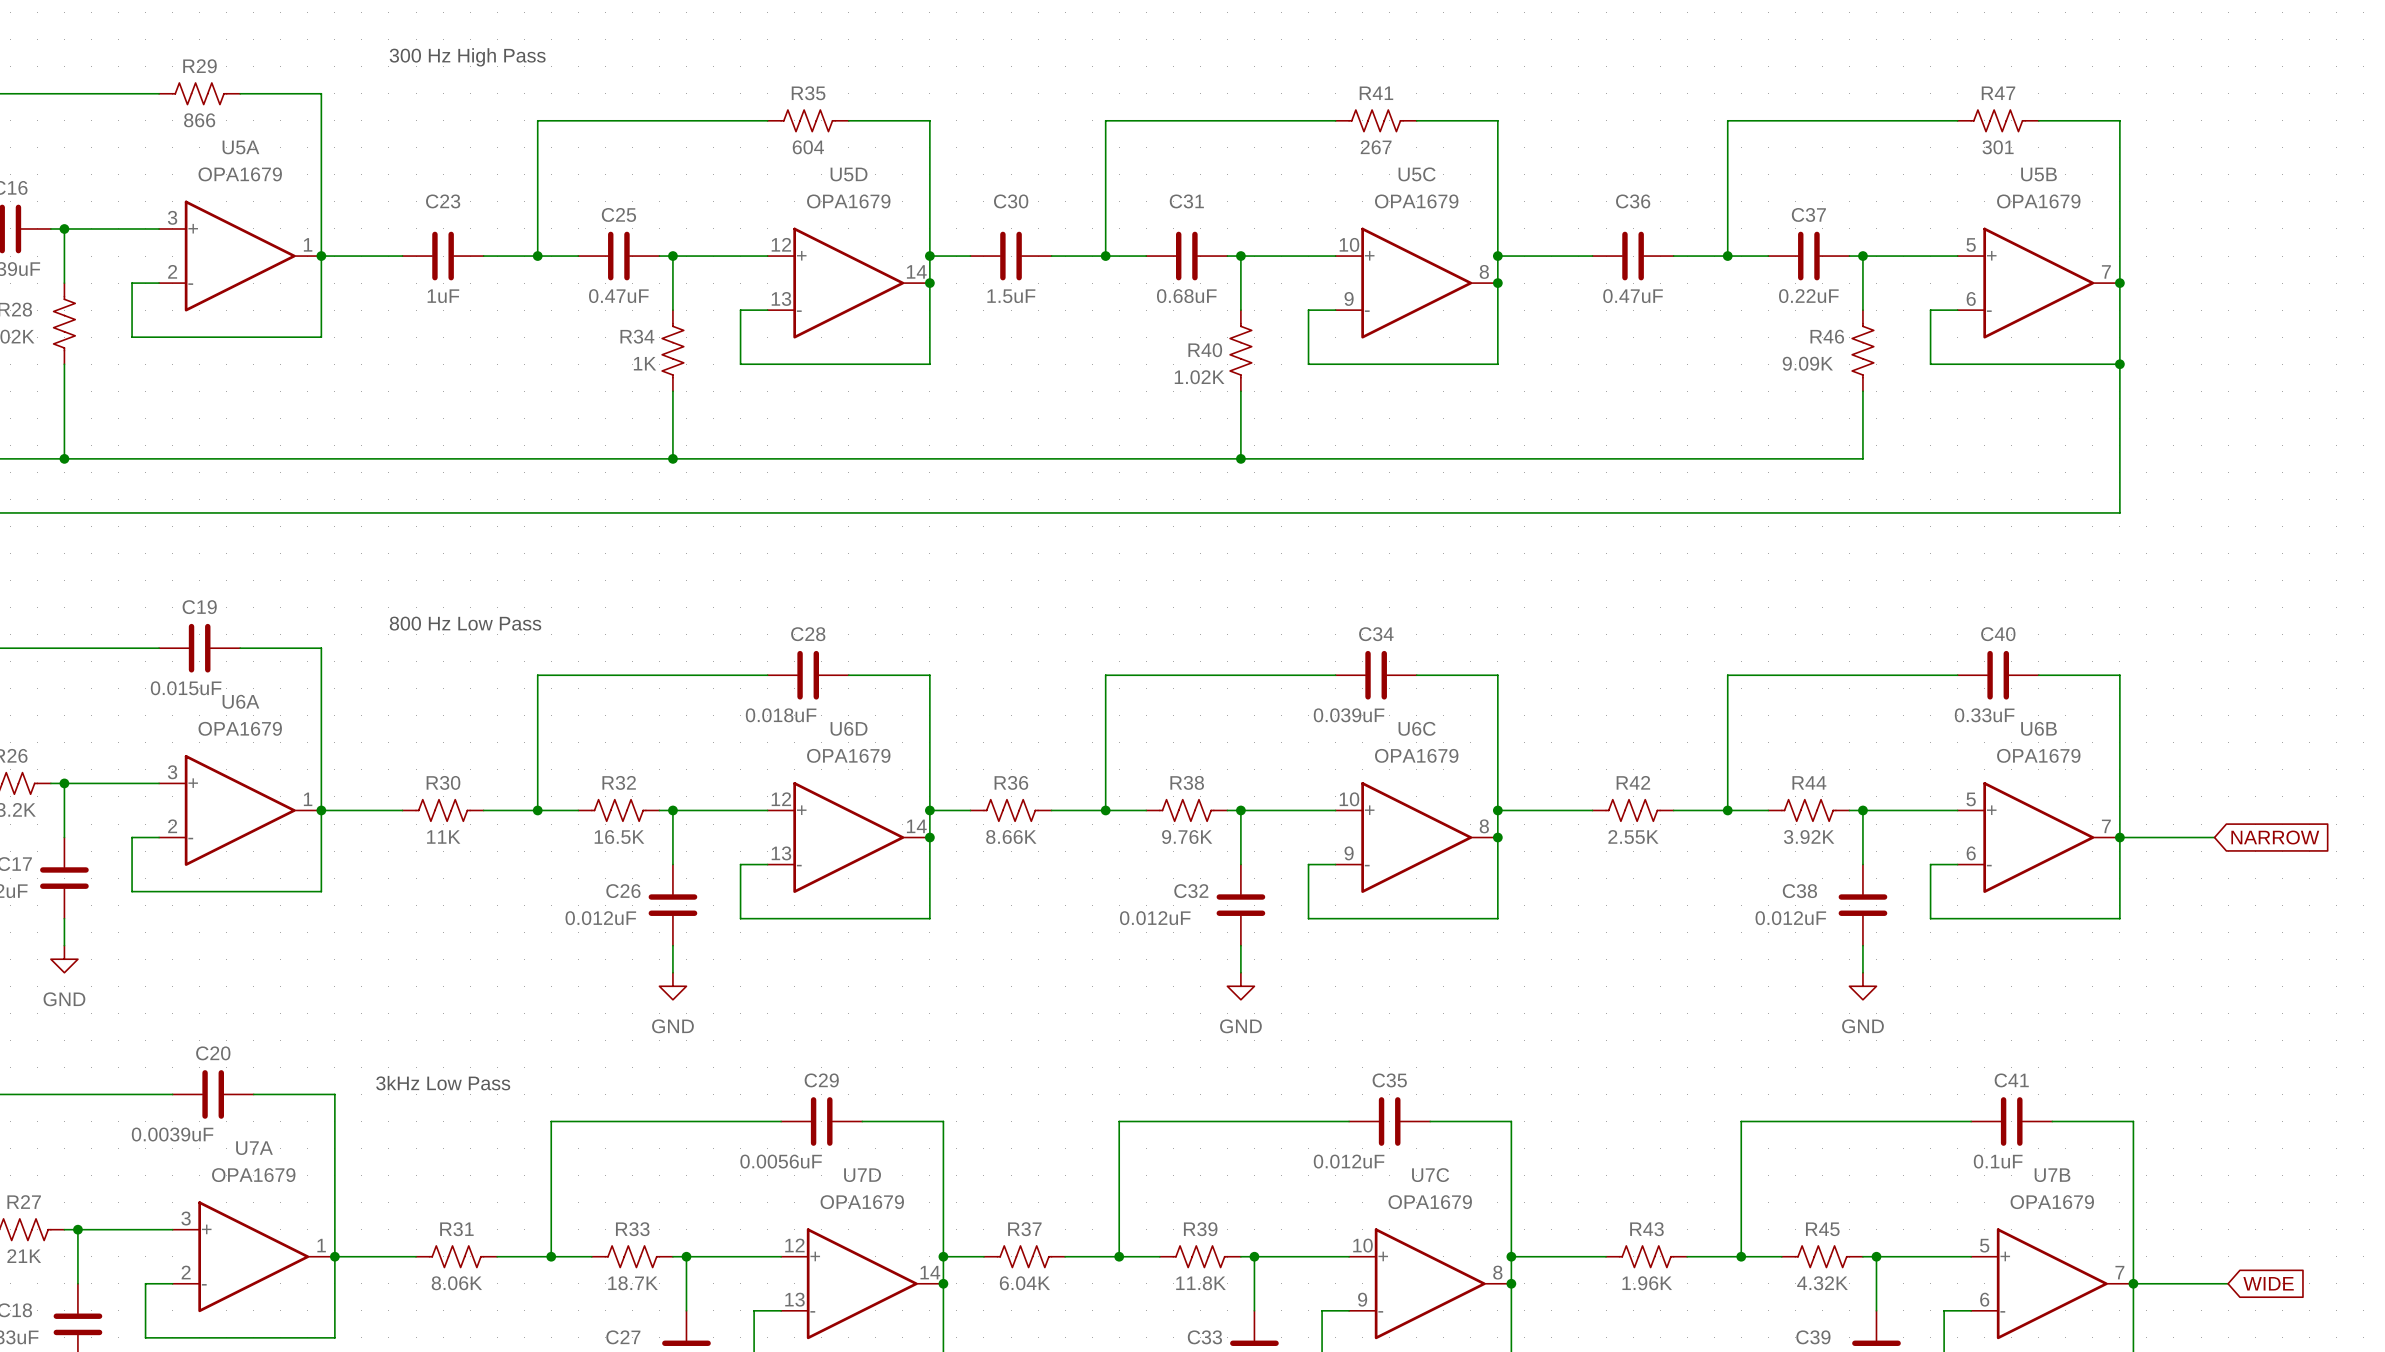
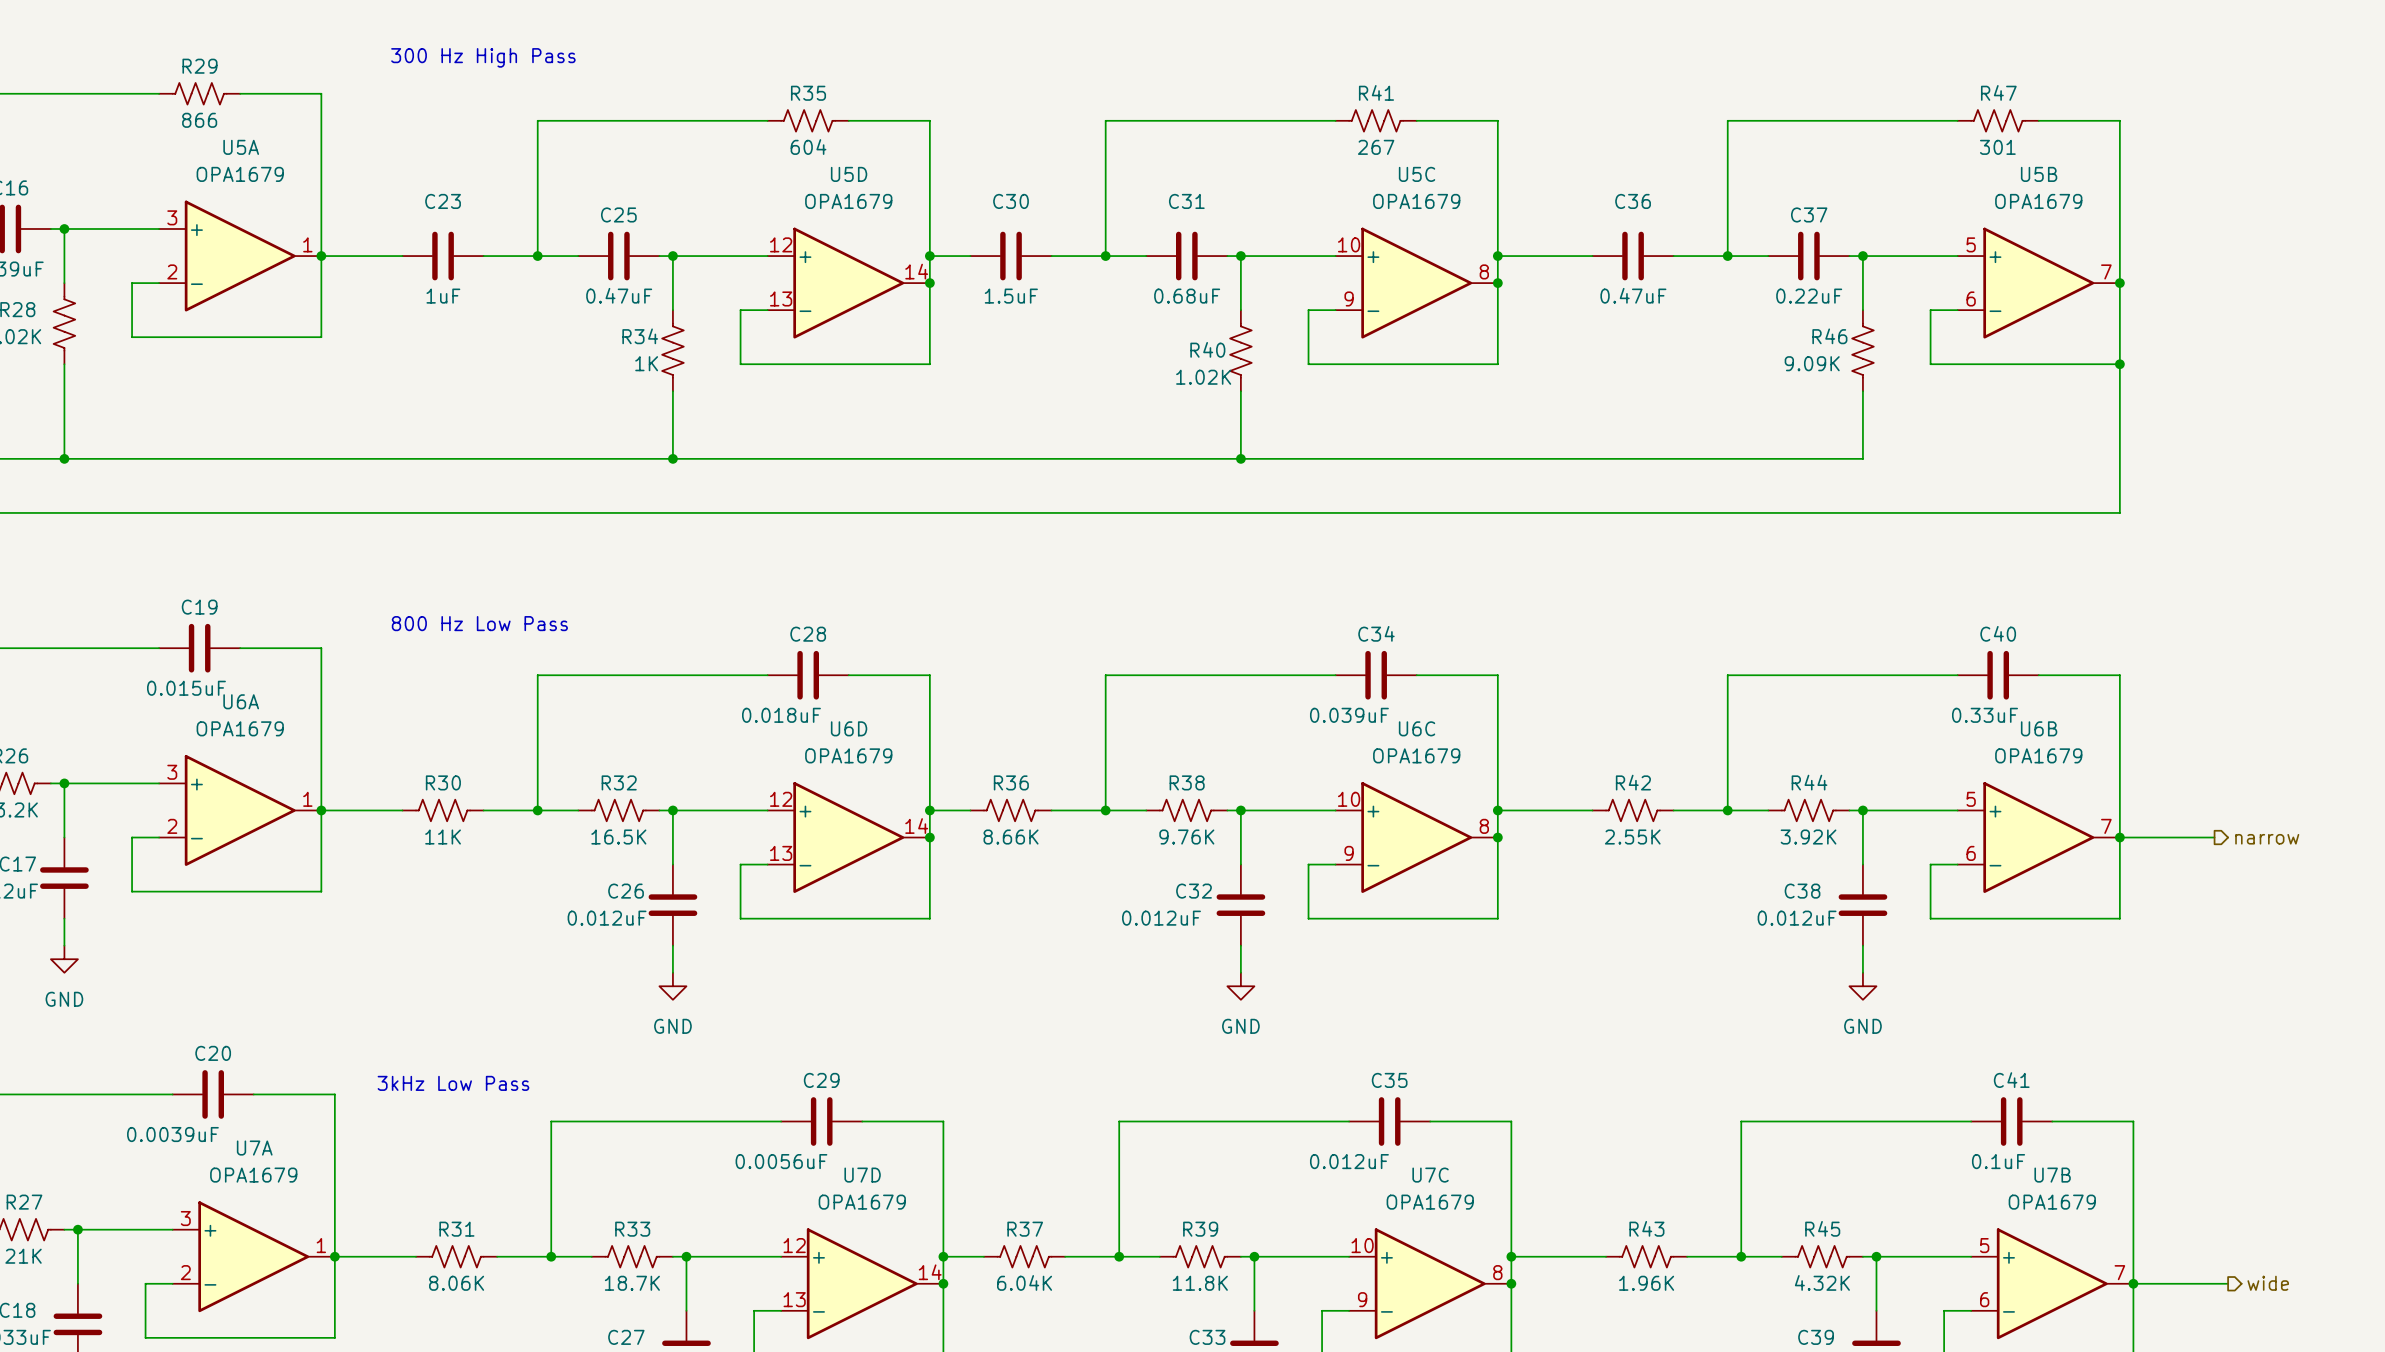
global label: NARROW (2275, 837) -> none
hierarchical label: none -> narrow (2267, 839)
hierarchical label: none -> wide (2268, 1283)
global label: WIDE (2268, 1283) -> none

